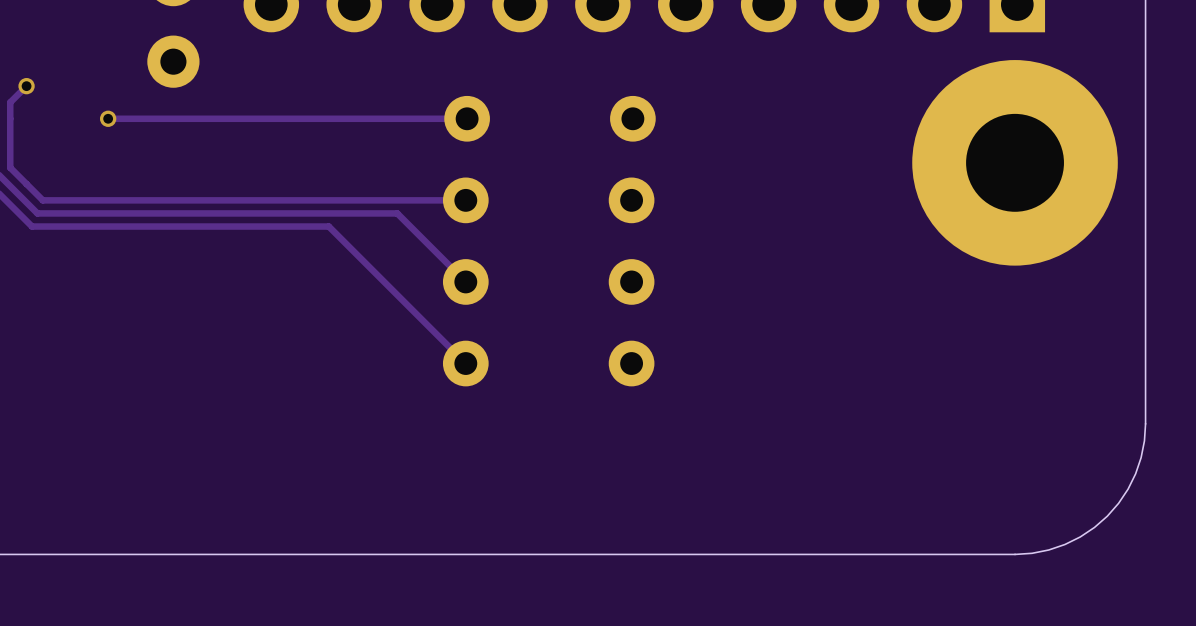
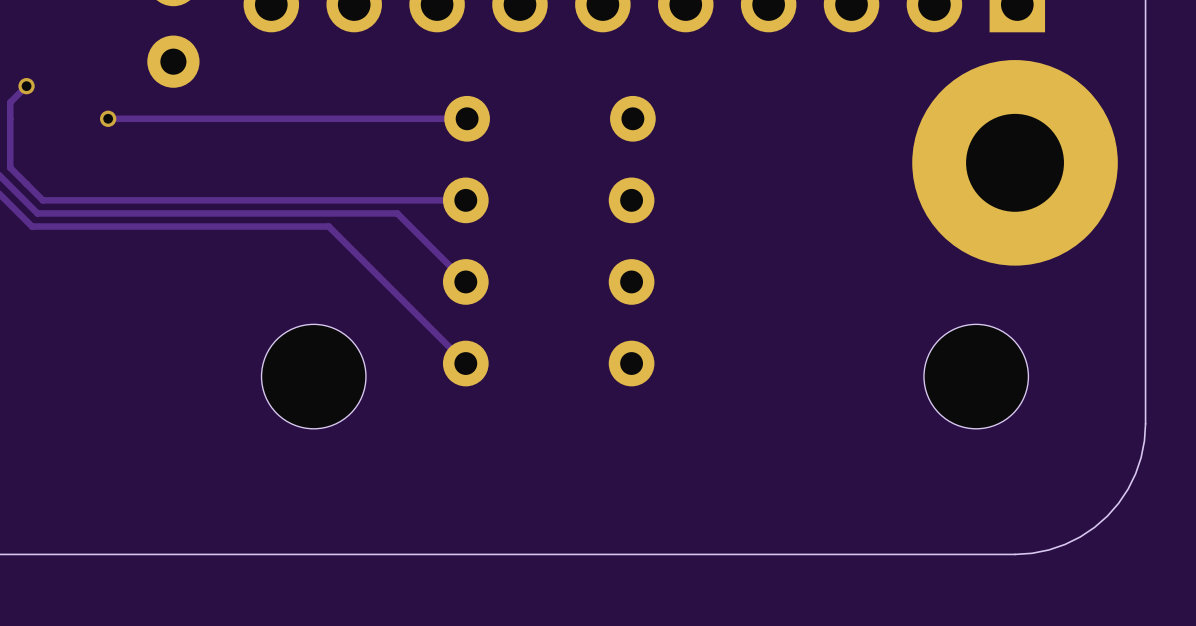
part: none -> (313, 376)
part: none -> (976, 376)

